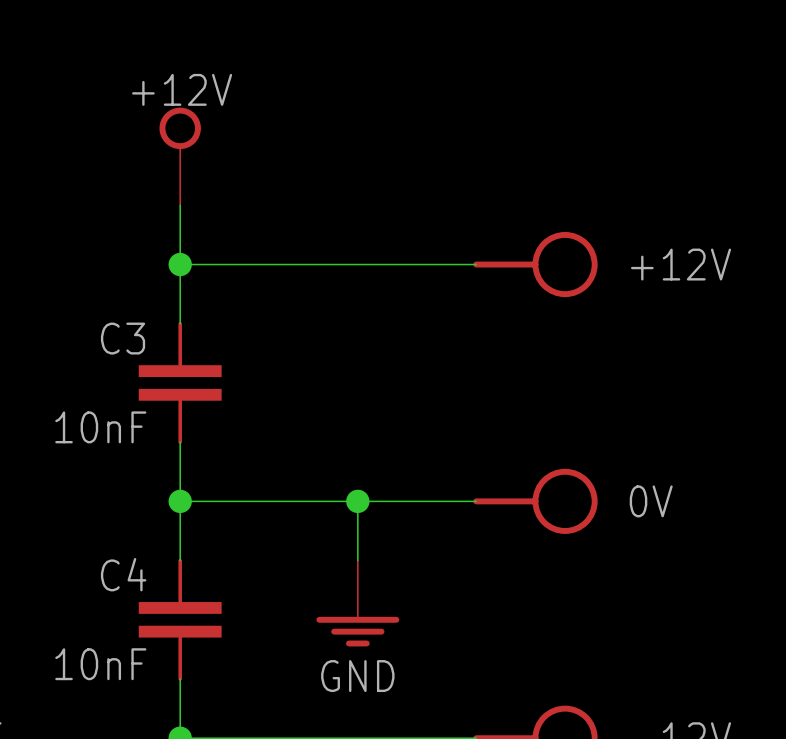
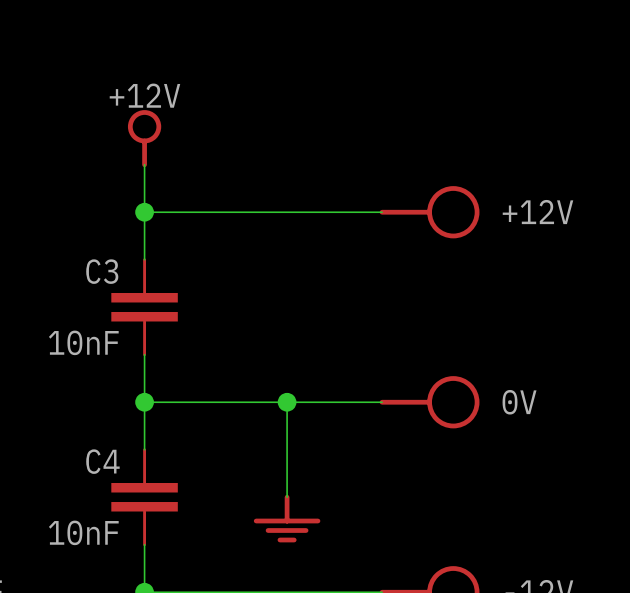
power symbol shape: [159, 107, 201, 206] -> [127, 110, 162, 168]
power symbol: GND (357, 603) -> none
power symbol: none -> (287, 518)

